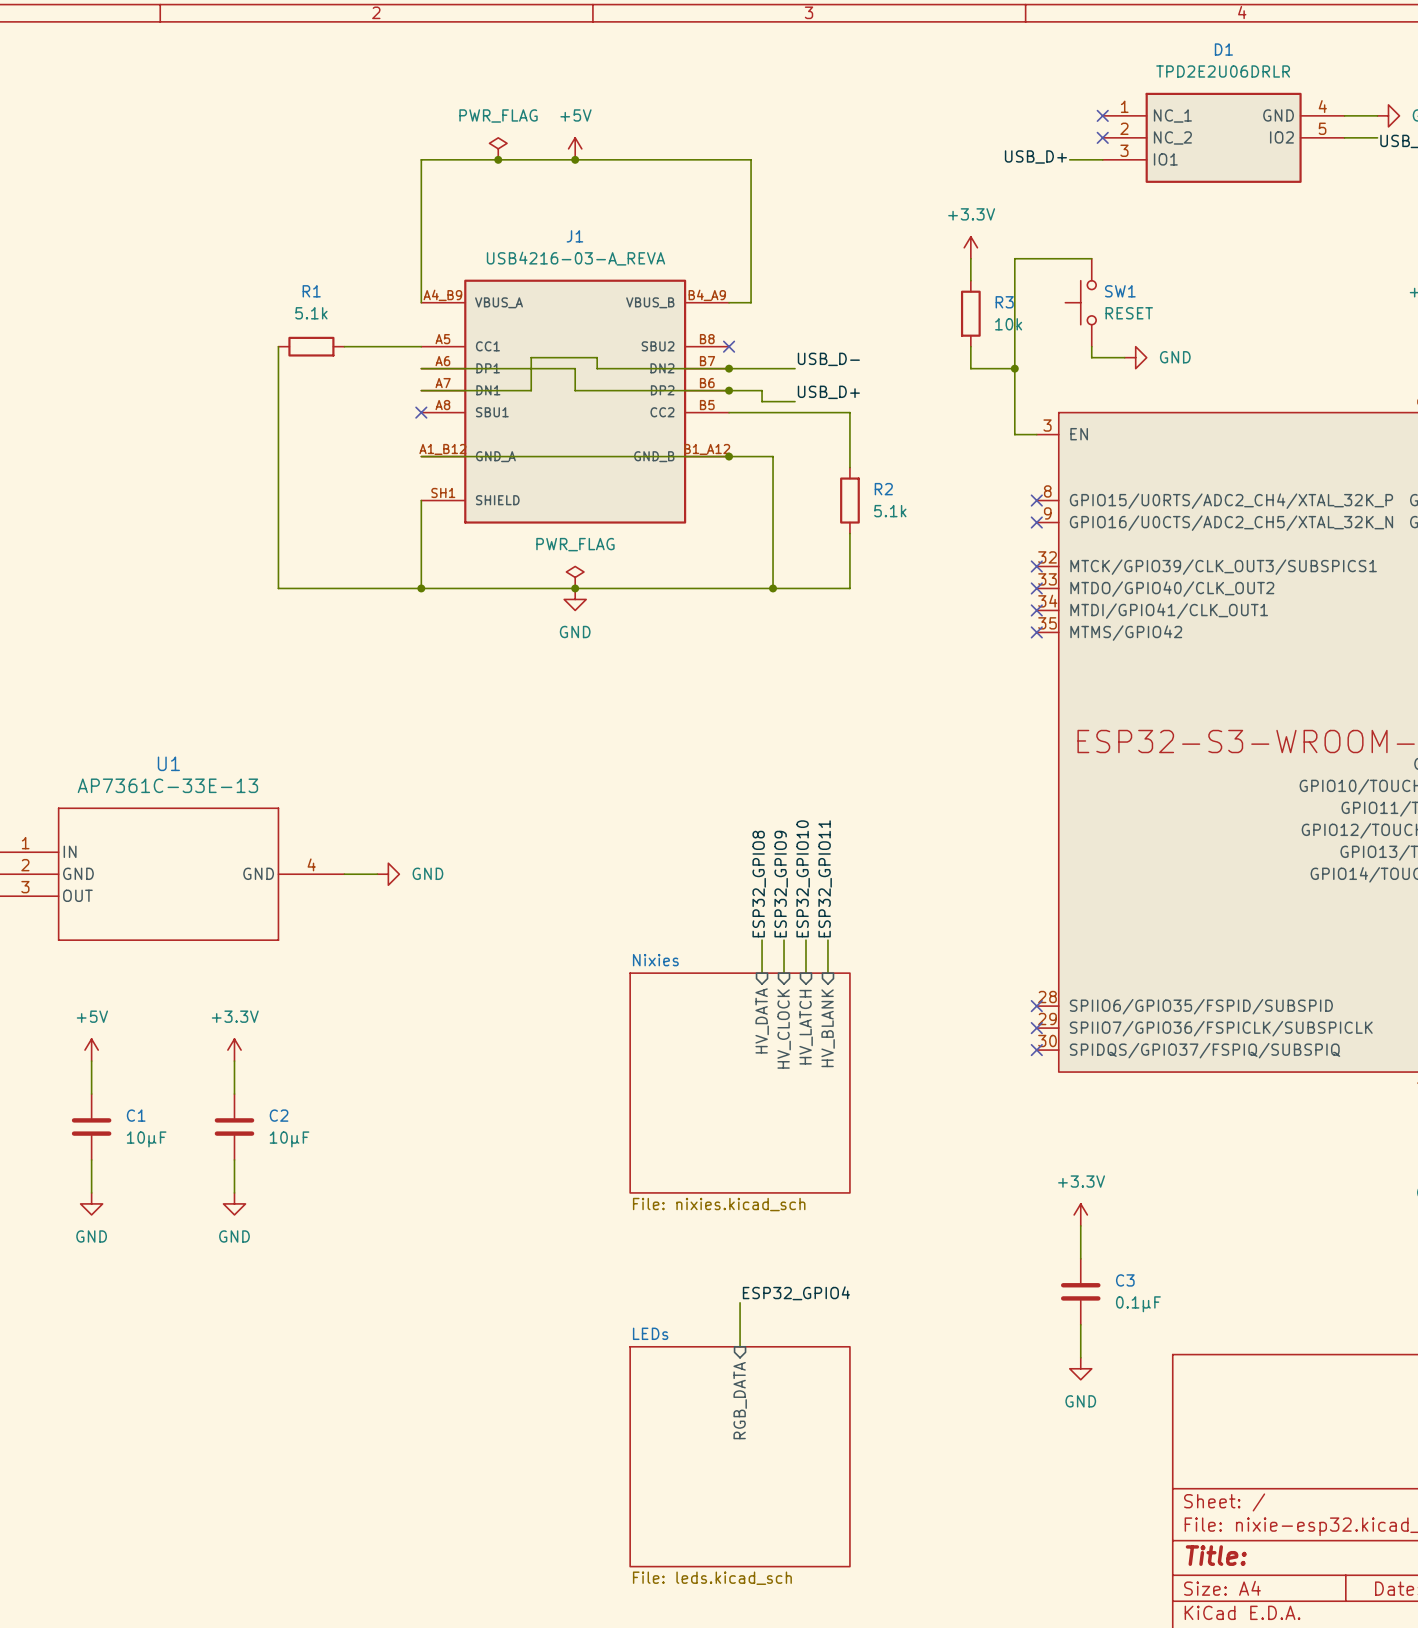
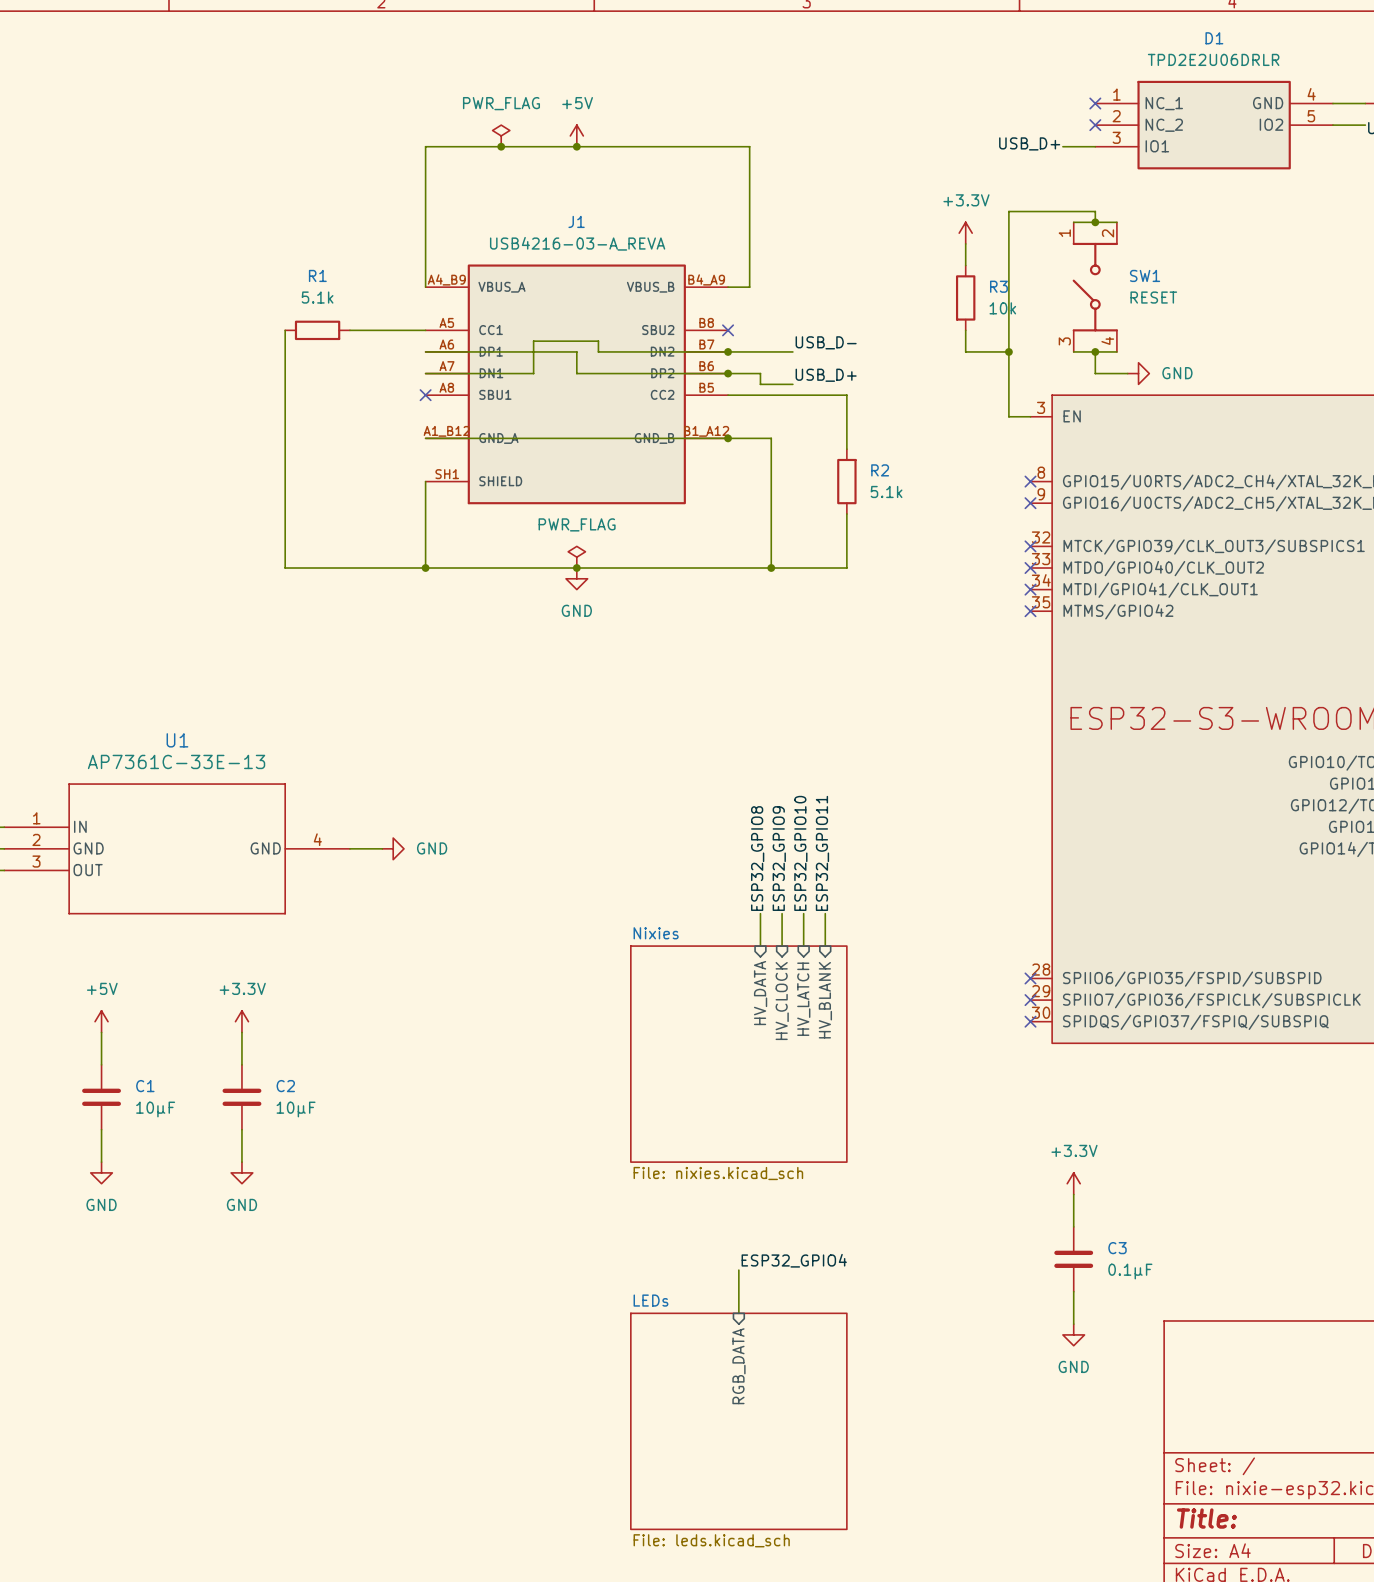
wire: none -> (1073, 222) (1116, 222)
junction: none -> (1095, 222)
wire: (1014, 258) (1091, 258) -> (1008, 243) (1008, 211) (1095, 211) (1095, 222)
SW1 symbol: [1065, 258, 1097, 347] -> [1072, 222, 1119, 352]
wire: (1091, 346) (1091, 357) (1124, 357) -> none
power symbol position: GND (1135, 357) -> GND (1138, 373)
wire: none -> (1073, 351) (1116, 351)
wire: none -> (1095, 351) (1095, 373) (1127, 373)
junction: none -> (1095, 351)

